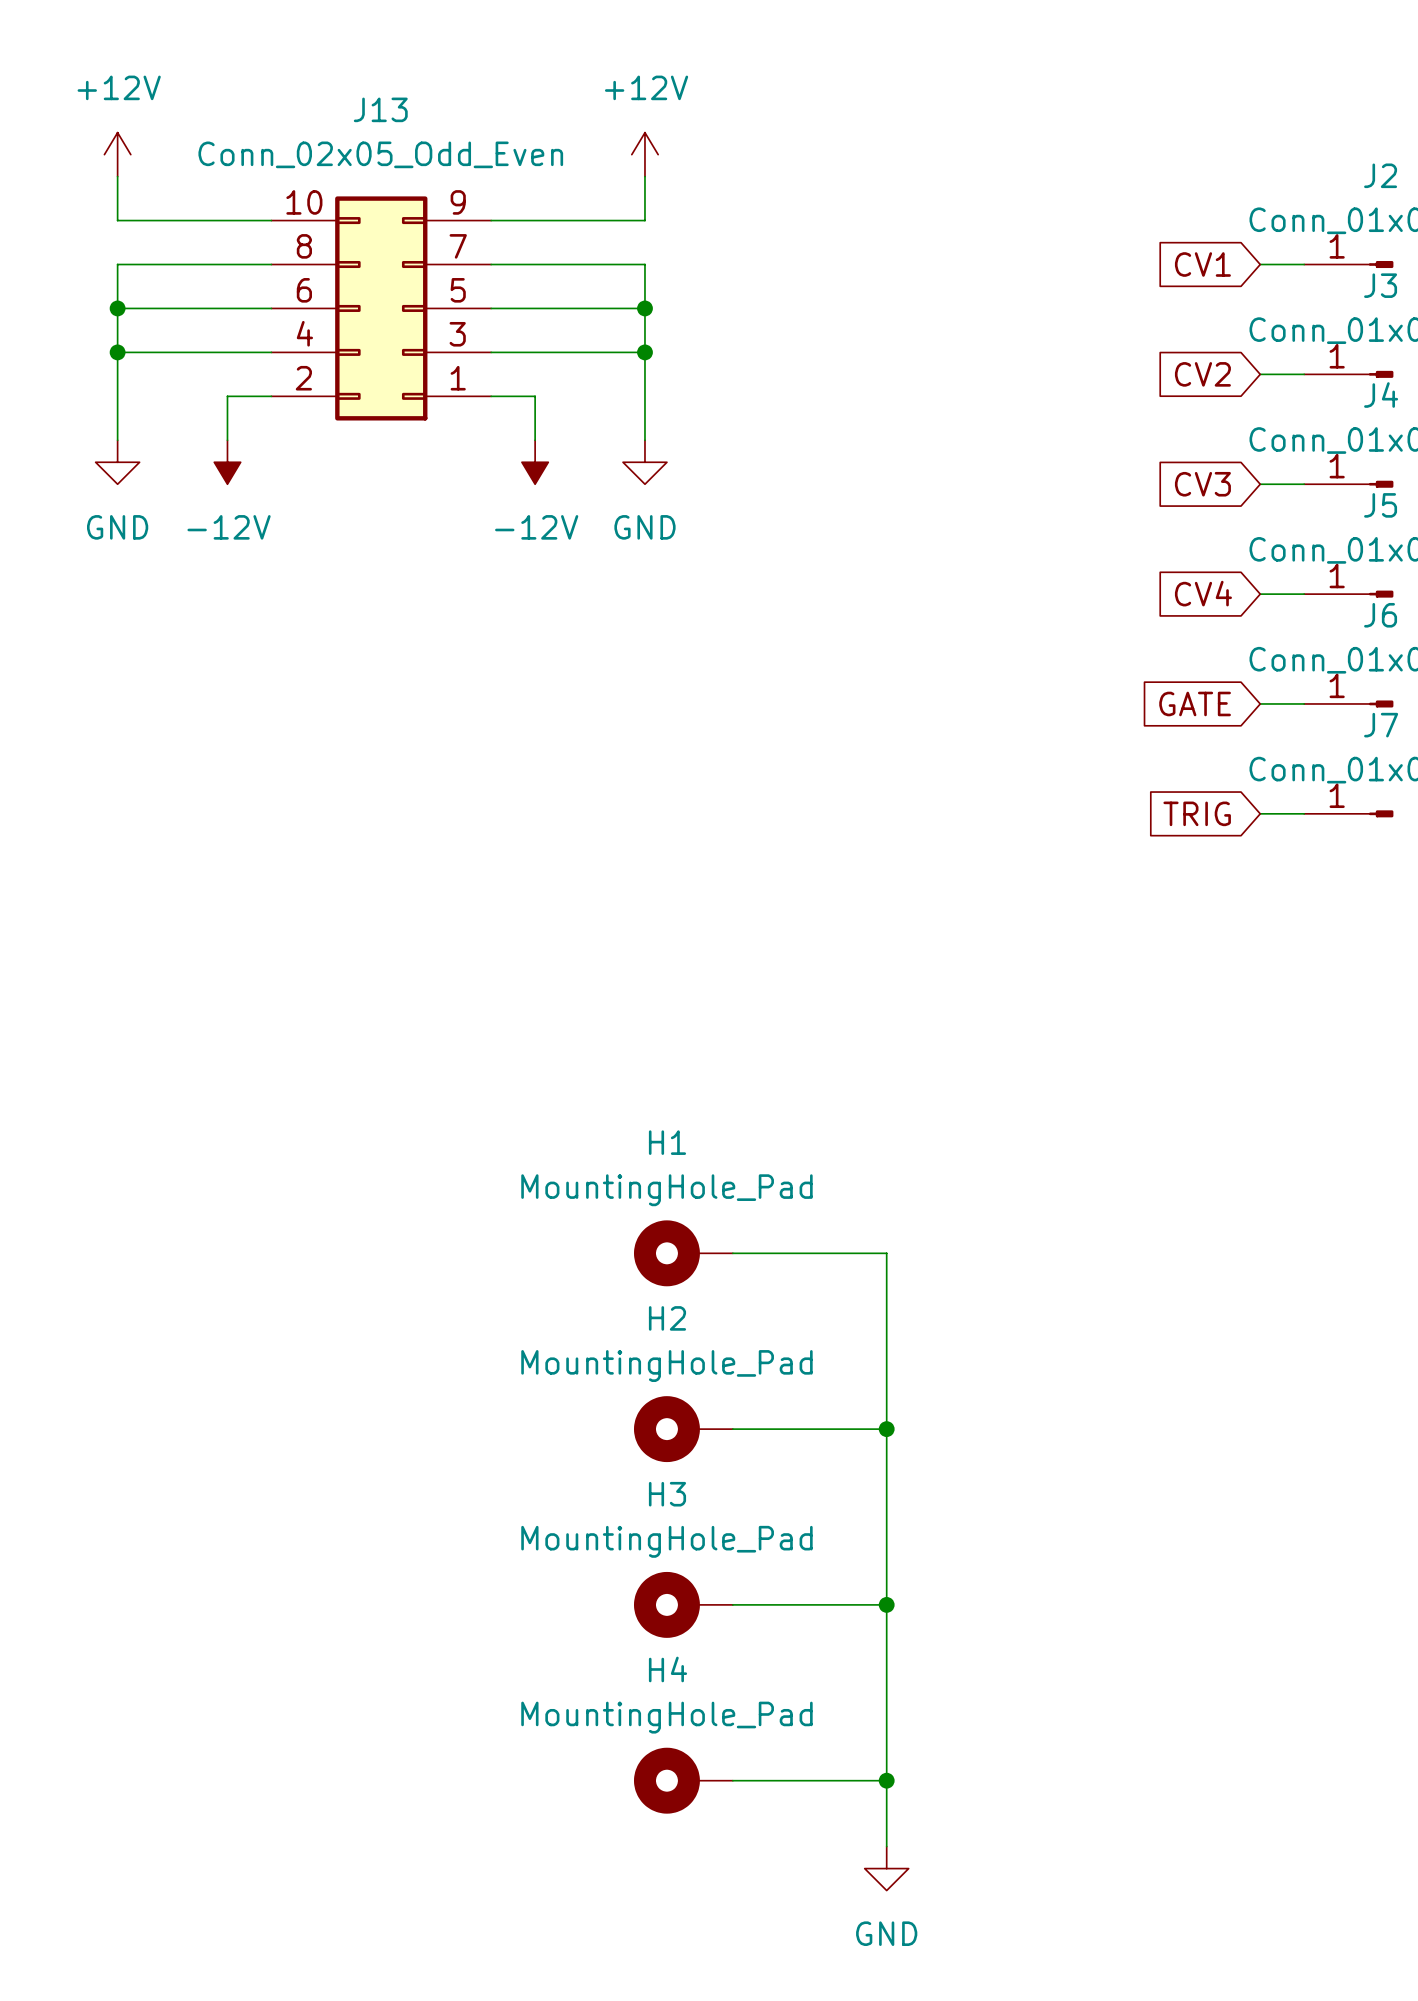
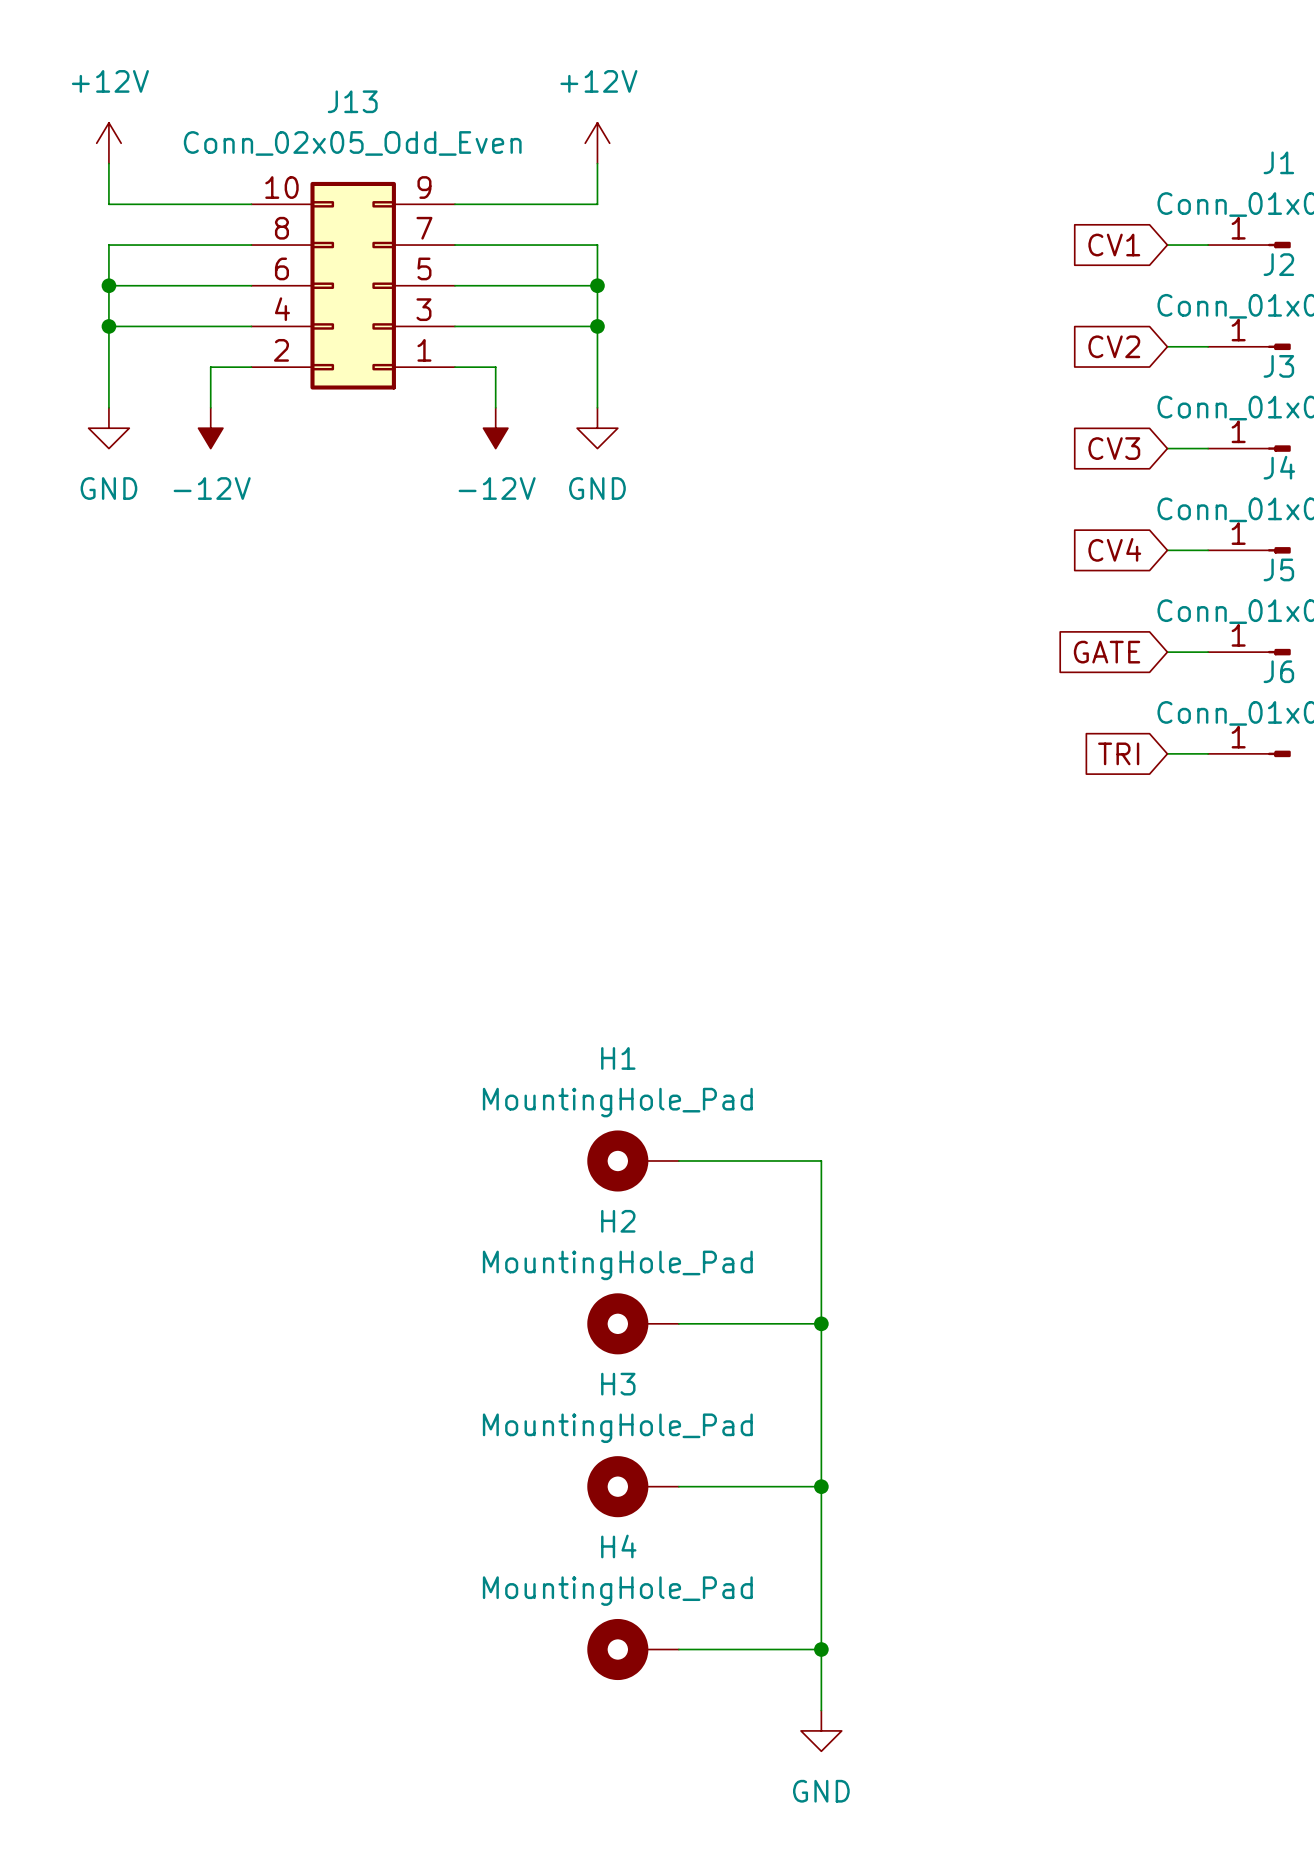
J2 name: J2 (1380, 175) -> J1 (1278, 162)
J3 name: J3 (1380, 285) -> J2 (1278, 264)
J4 name: J4 (1381, 395) -> J3 (1278, 366)
J5 name: J5 (1380, 505) -> J4 (1279, 467)
J6 name: J6 (1380, 615) -> J5 (1278, 569)
J7 name: J7 (1381, 725) -> J6 (1278, 671)
global label: TRIG (1197, 813) -> TRI (1118, 753)

